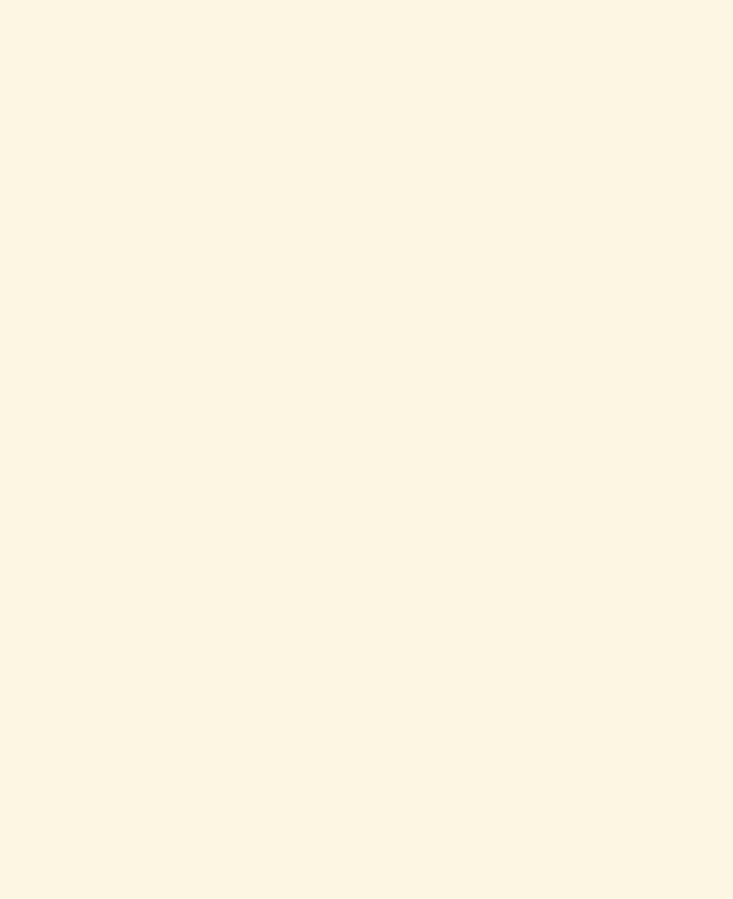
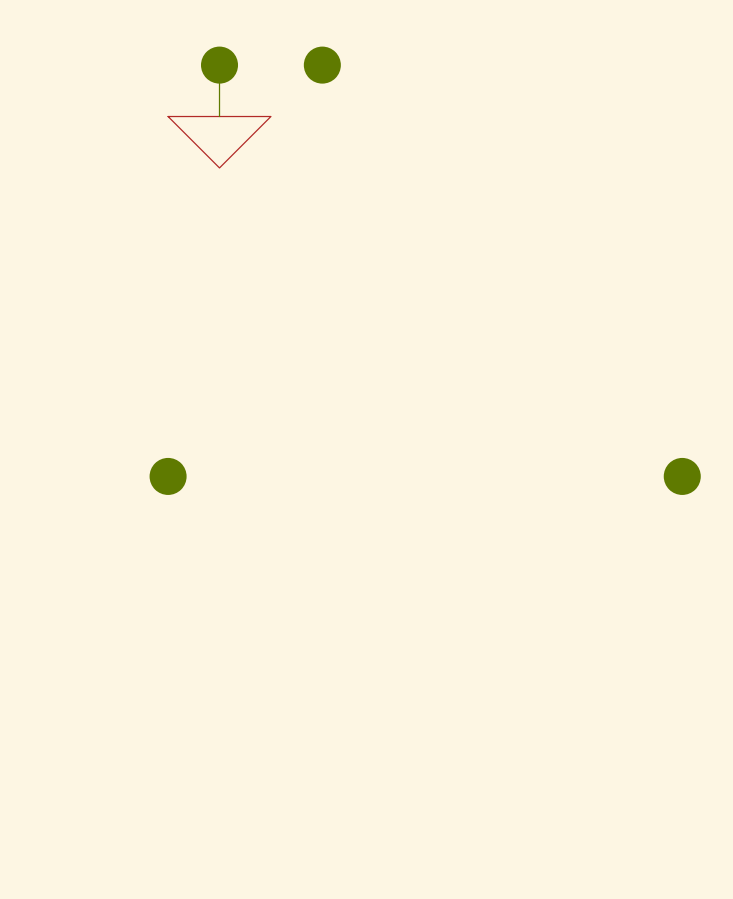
wire: none -> (219, 65) (219, 116)
junction: none -> (219, 65)
junction: none -> (322, 65)
power symbol: none -> (219, 142)
junction: none -> (168, 476)
junction: none -> (682, 476)

